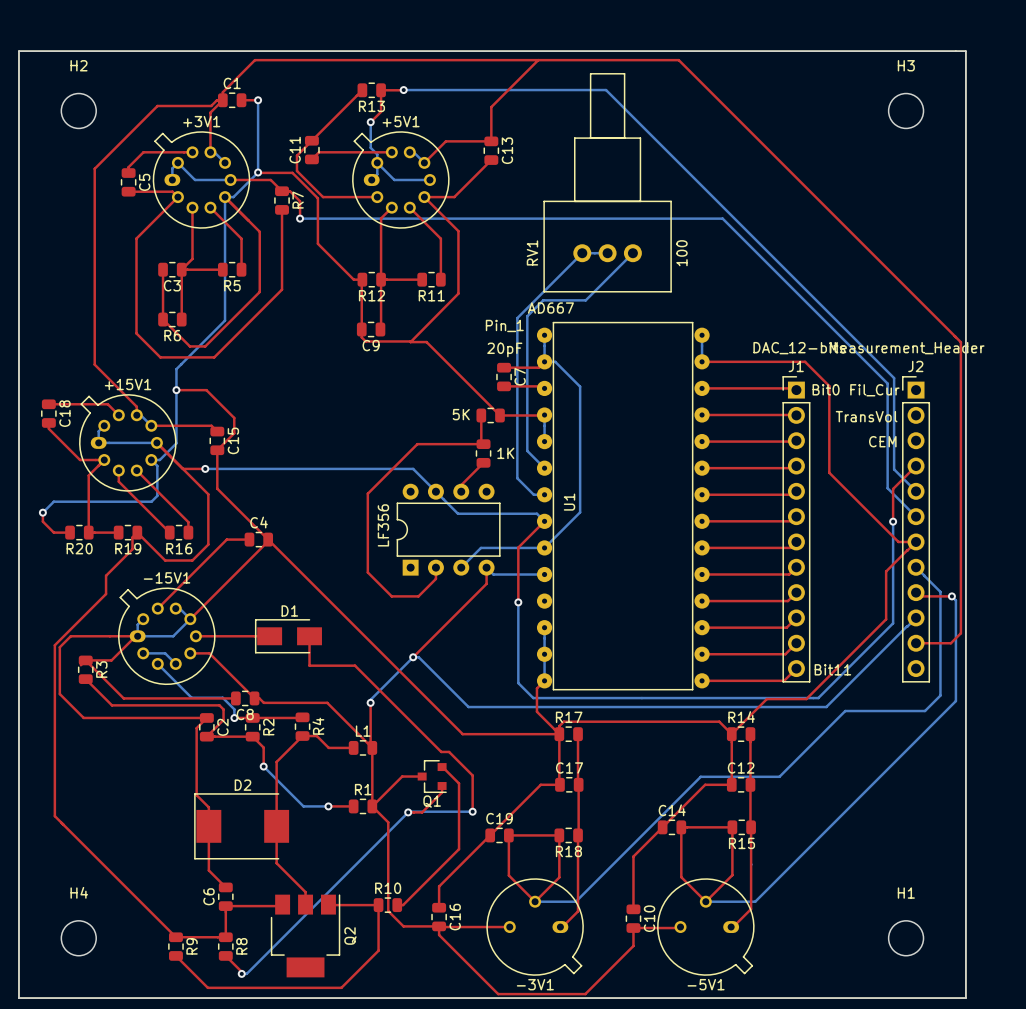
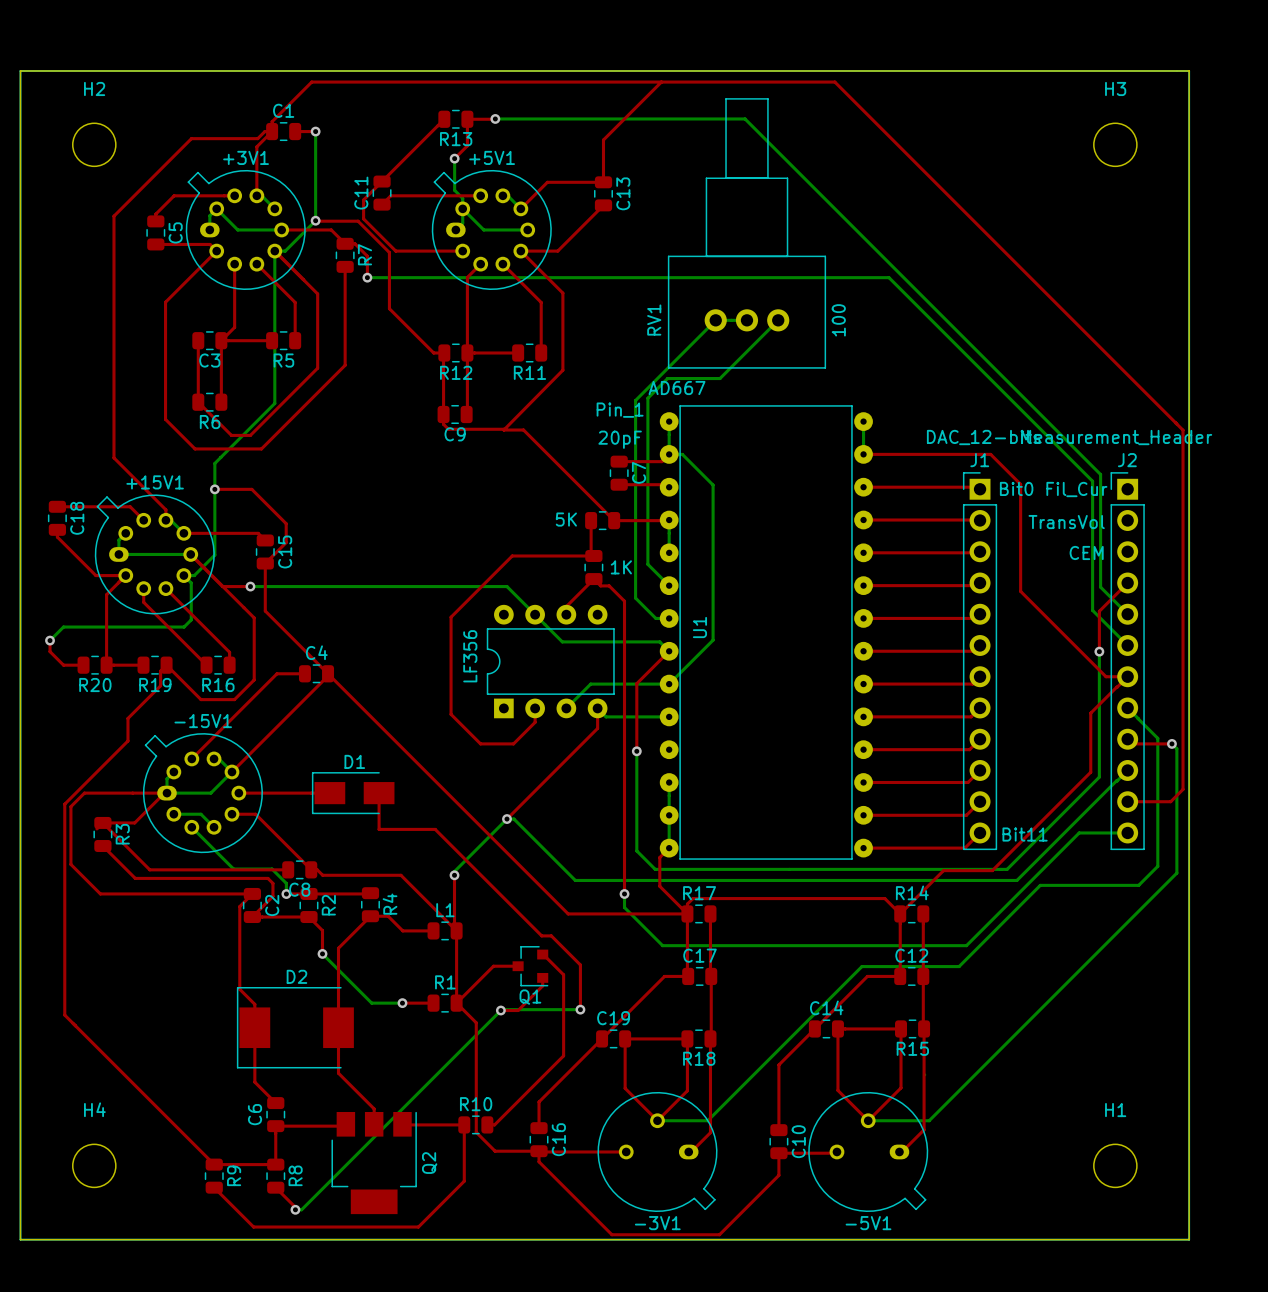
top track: none -> (593, 579) (600, 585) (609, 585) (624, 601) (624, 893)
bottom track: none -> (1127, 832) (1079, 832) (966, 945) (662, 945) (624, 907) (624, 893)
via: none -> (624, 893)

